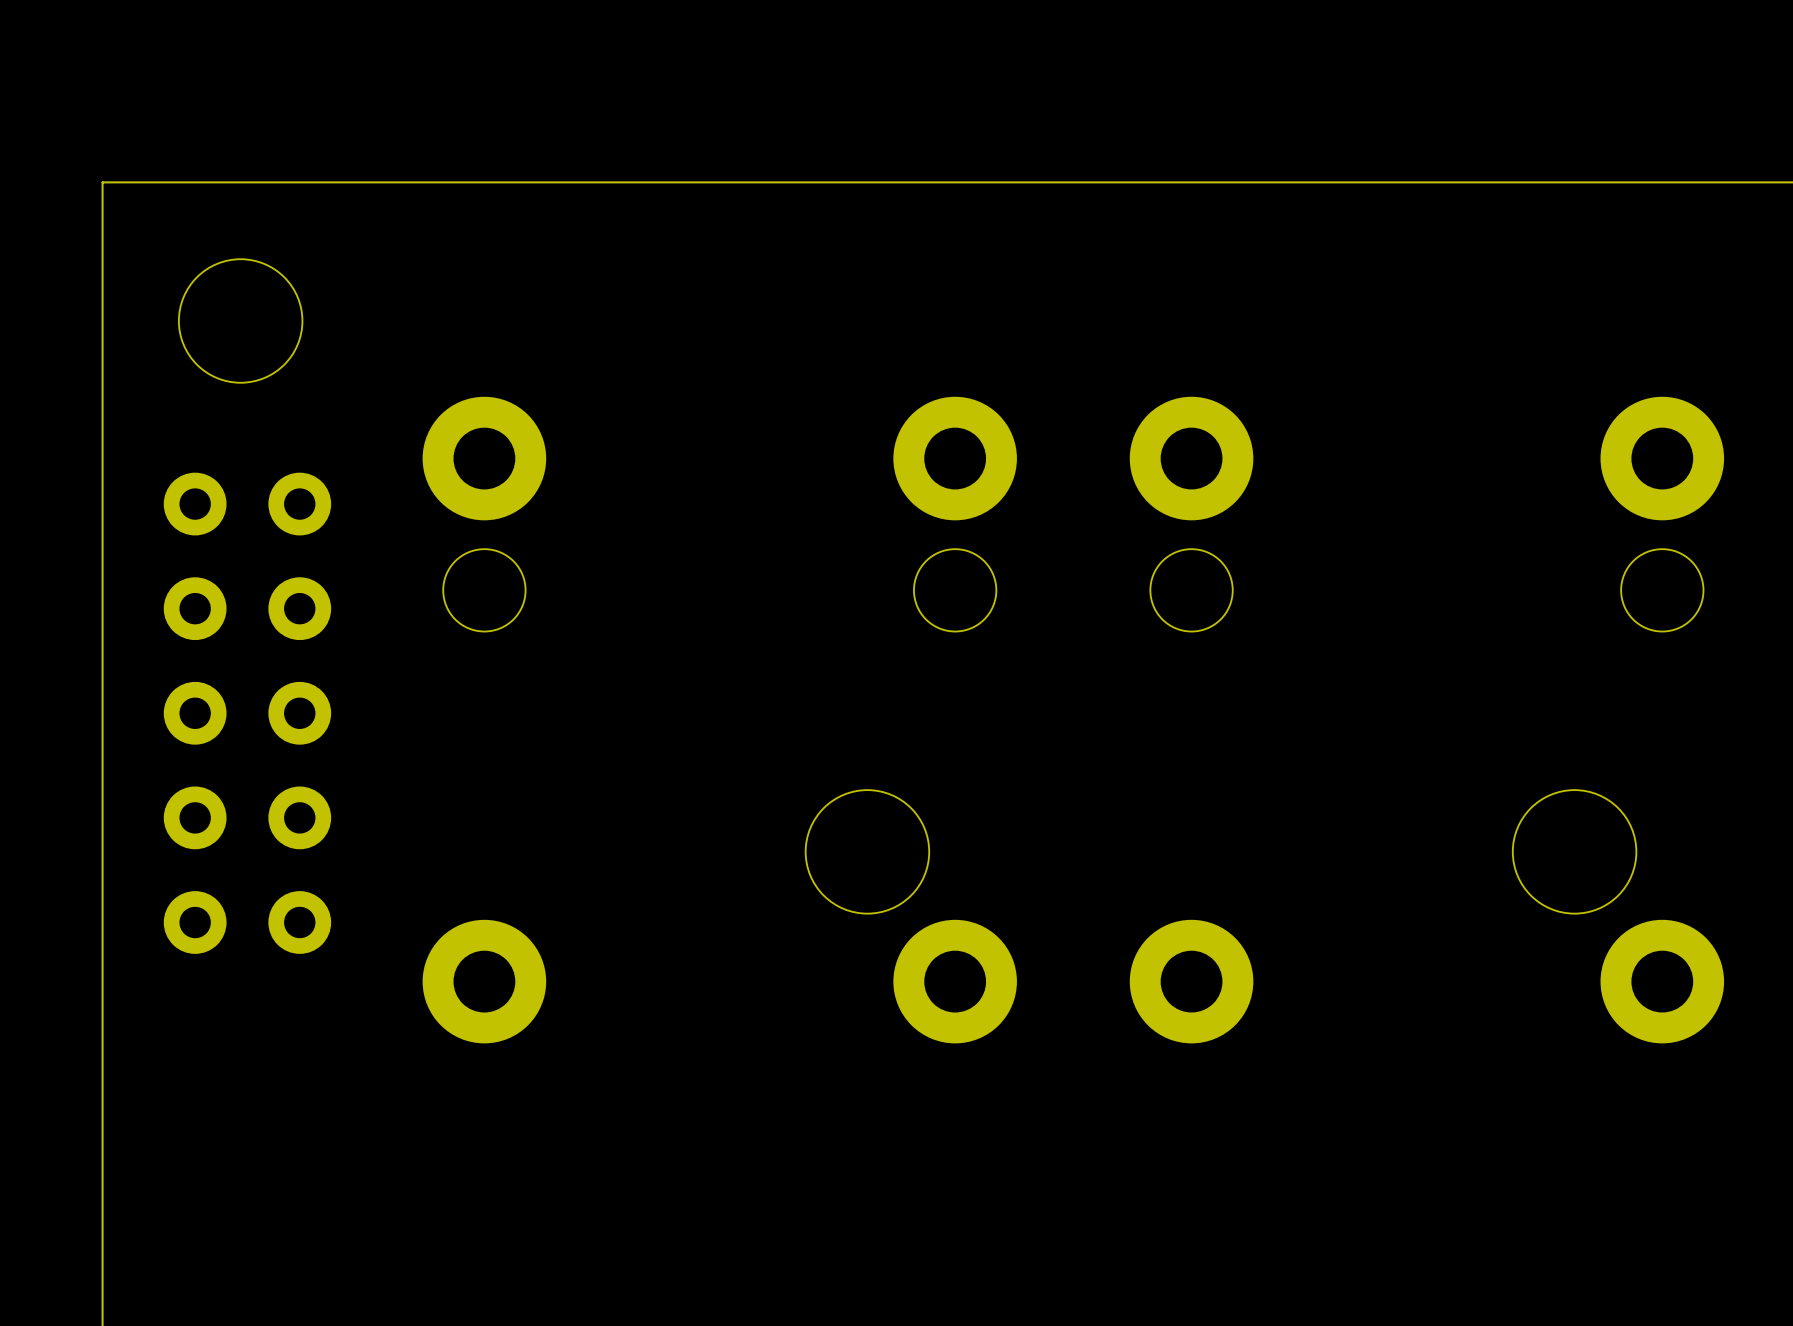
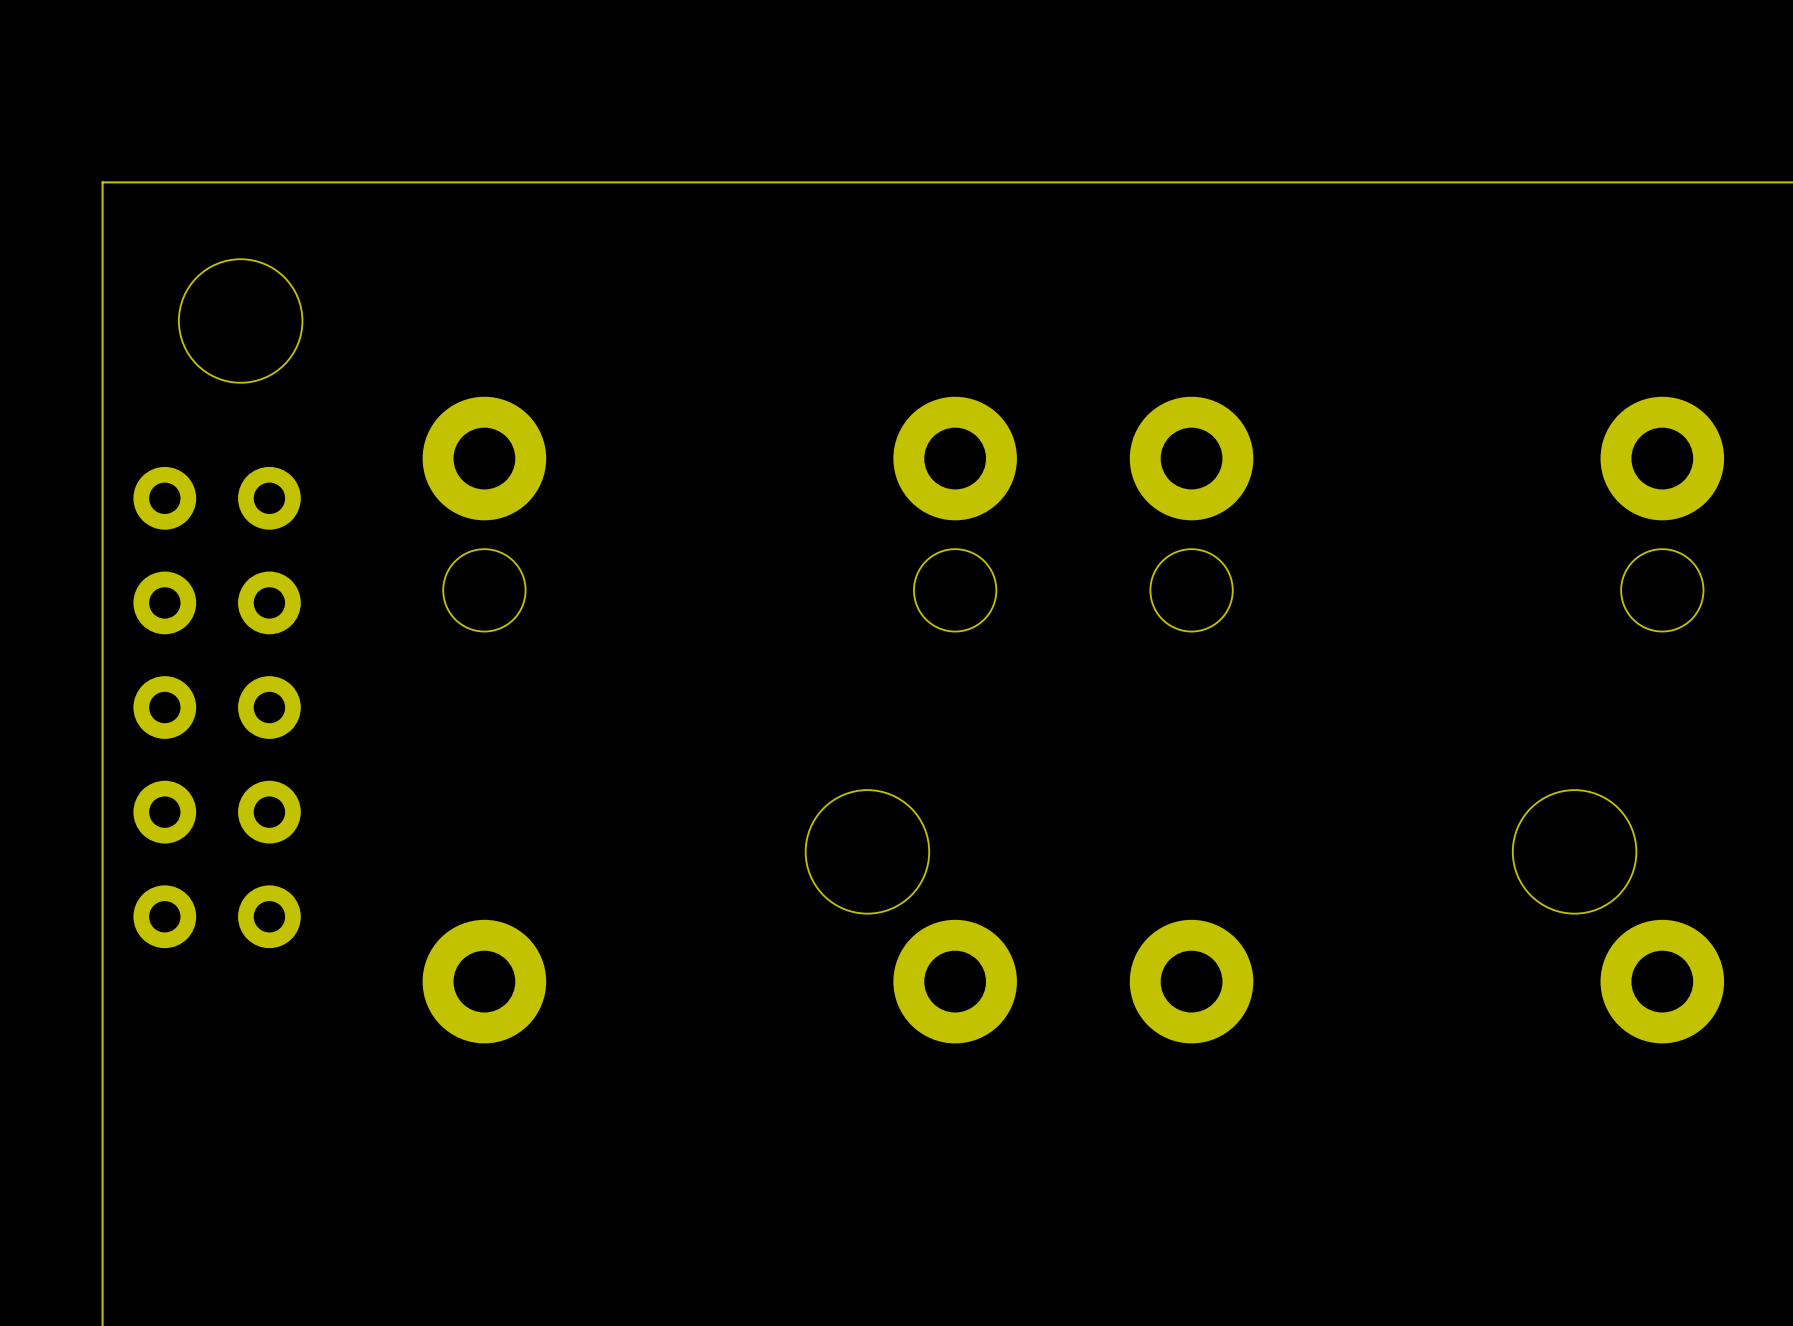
part position: (247, 713) -> (217, 707)

